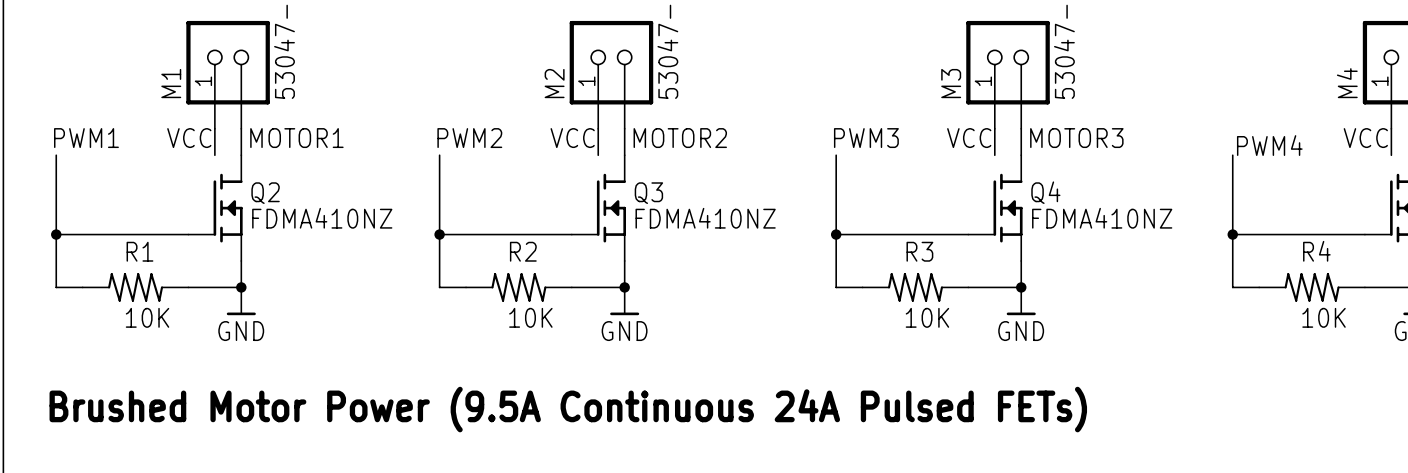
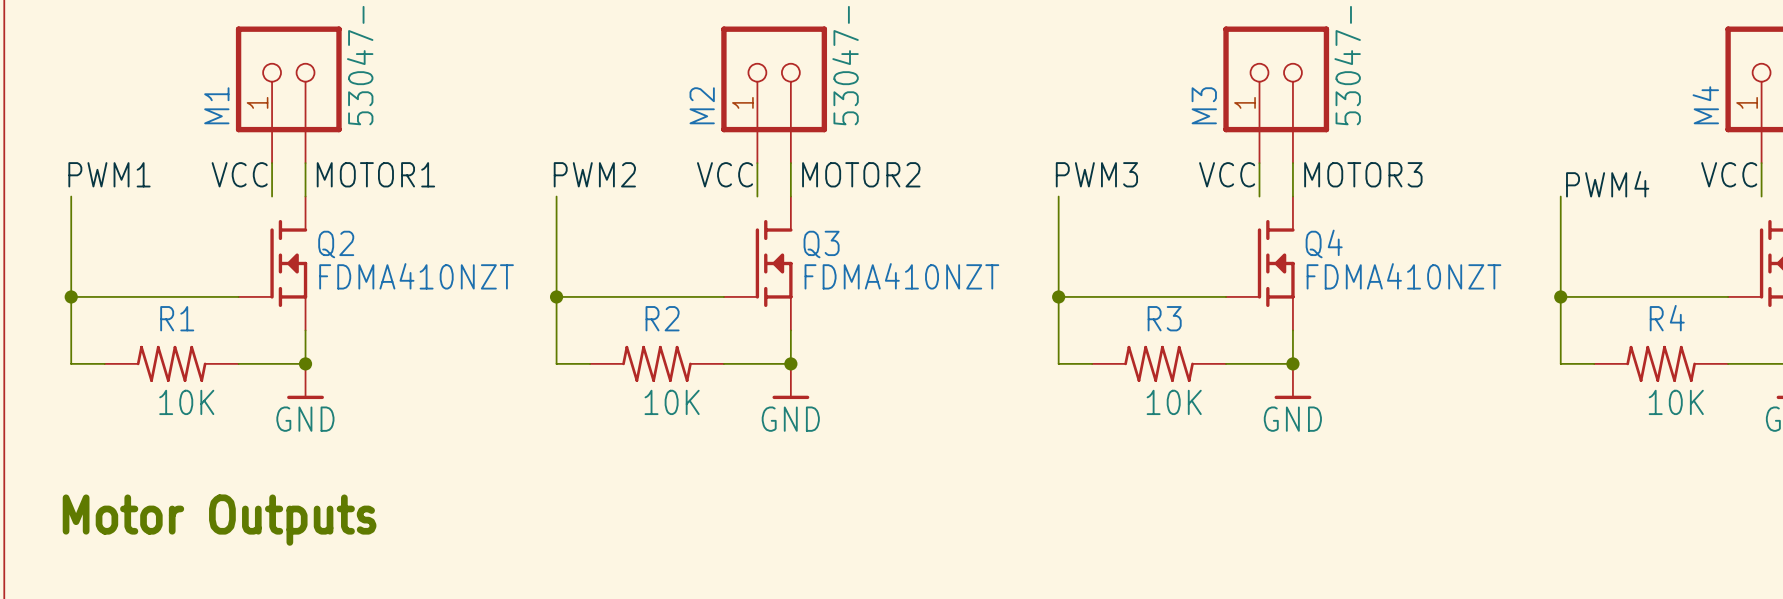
Q2 value: FDMA410NZ (322, 218) -> FDMA410NZT (416, 276)
Q3 value: FDMA410NZ (705, 218) -> FDMA410NZT (901, 276)
Q4 value: FDMA410NZ (1102, 218) -> FDMA410NZT (1403, 276)
text: Brushed Motor Power (9.5A Continuous 24A Pulsed FETs) (568, 409) -> Motor Outputs (219, 520)

